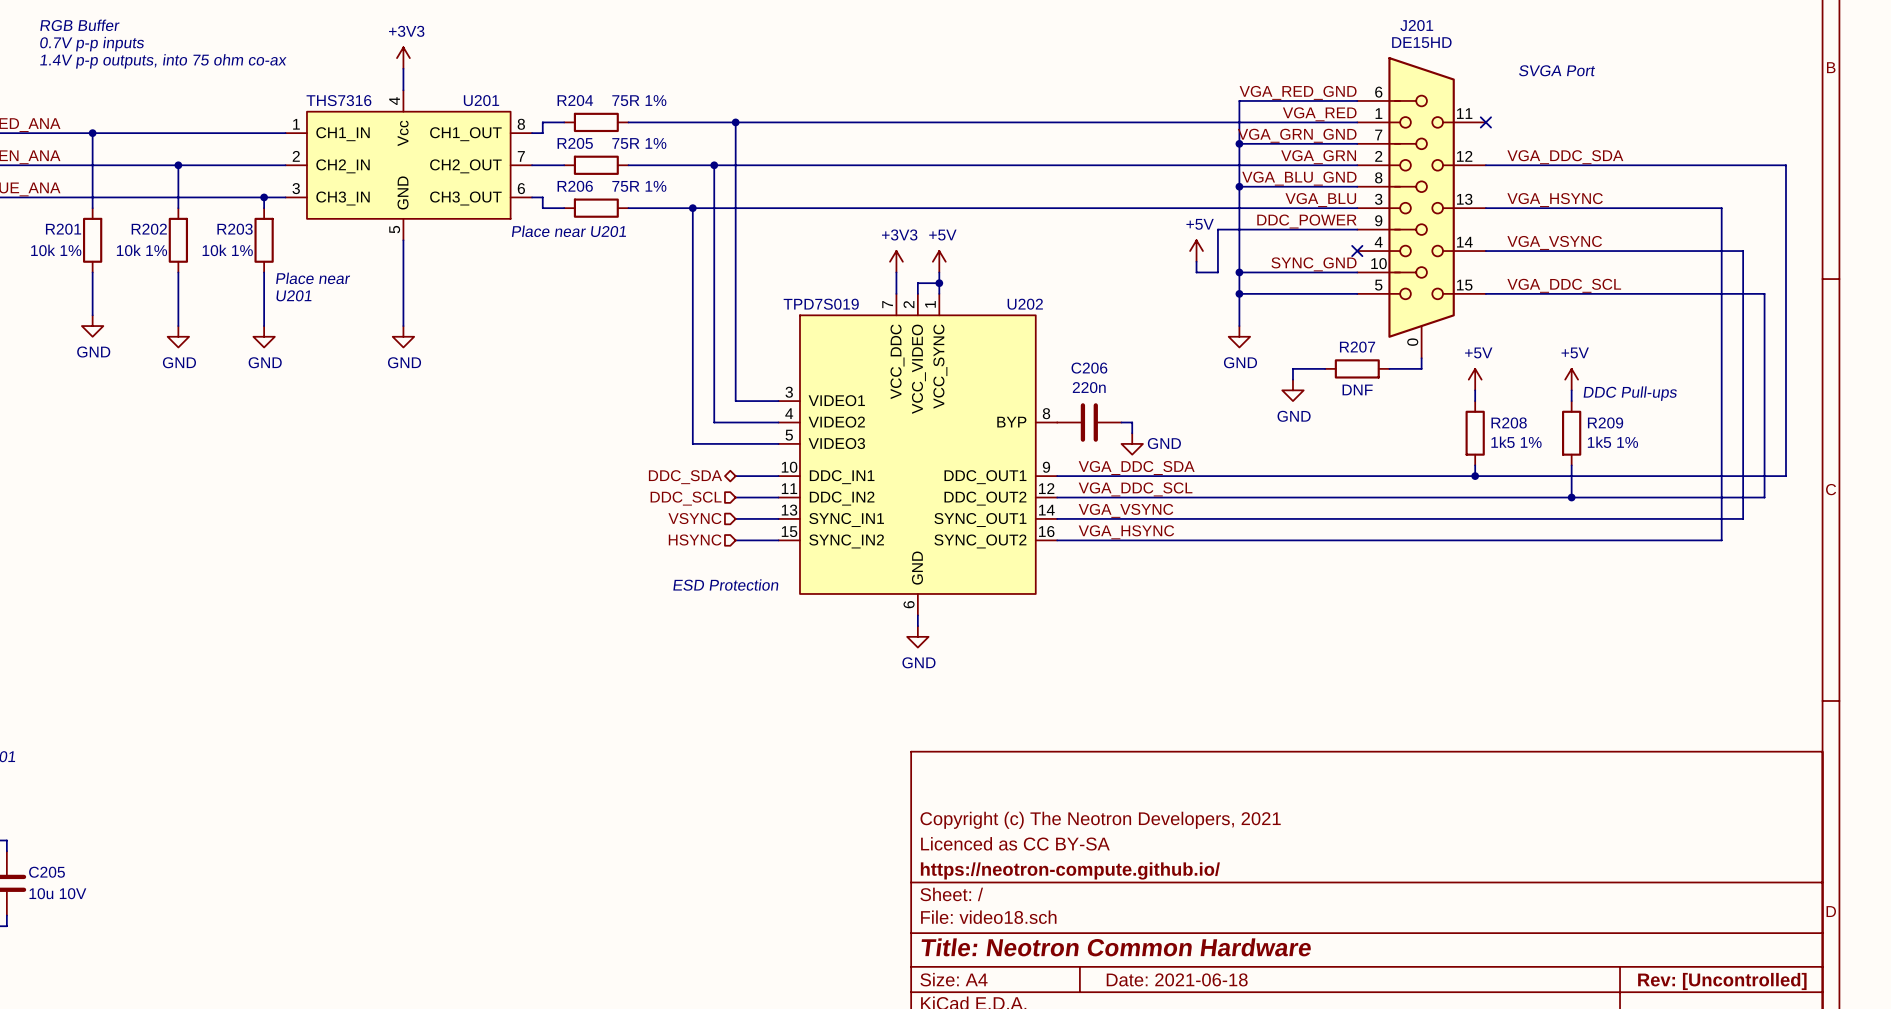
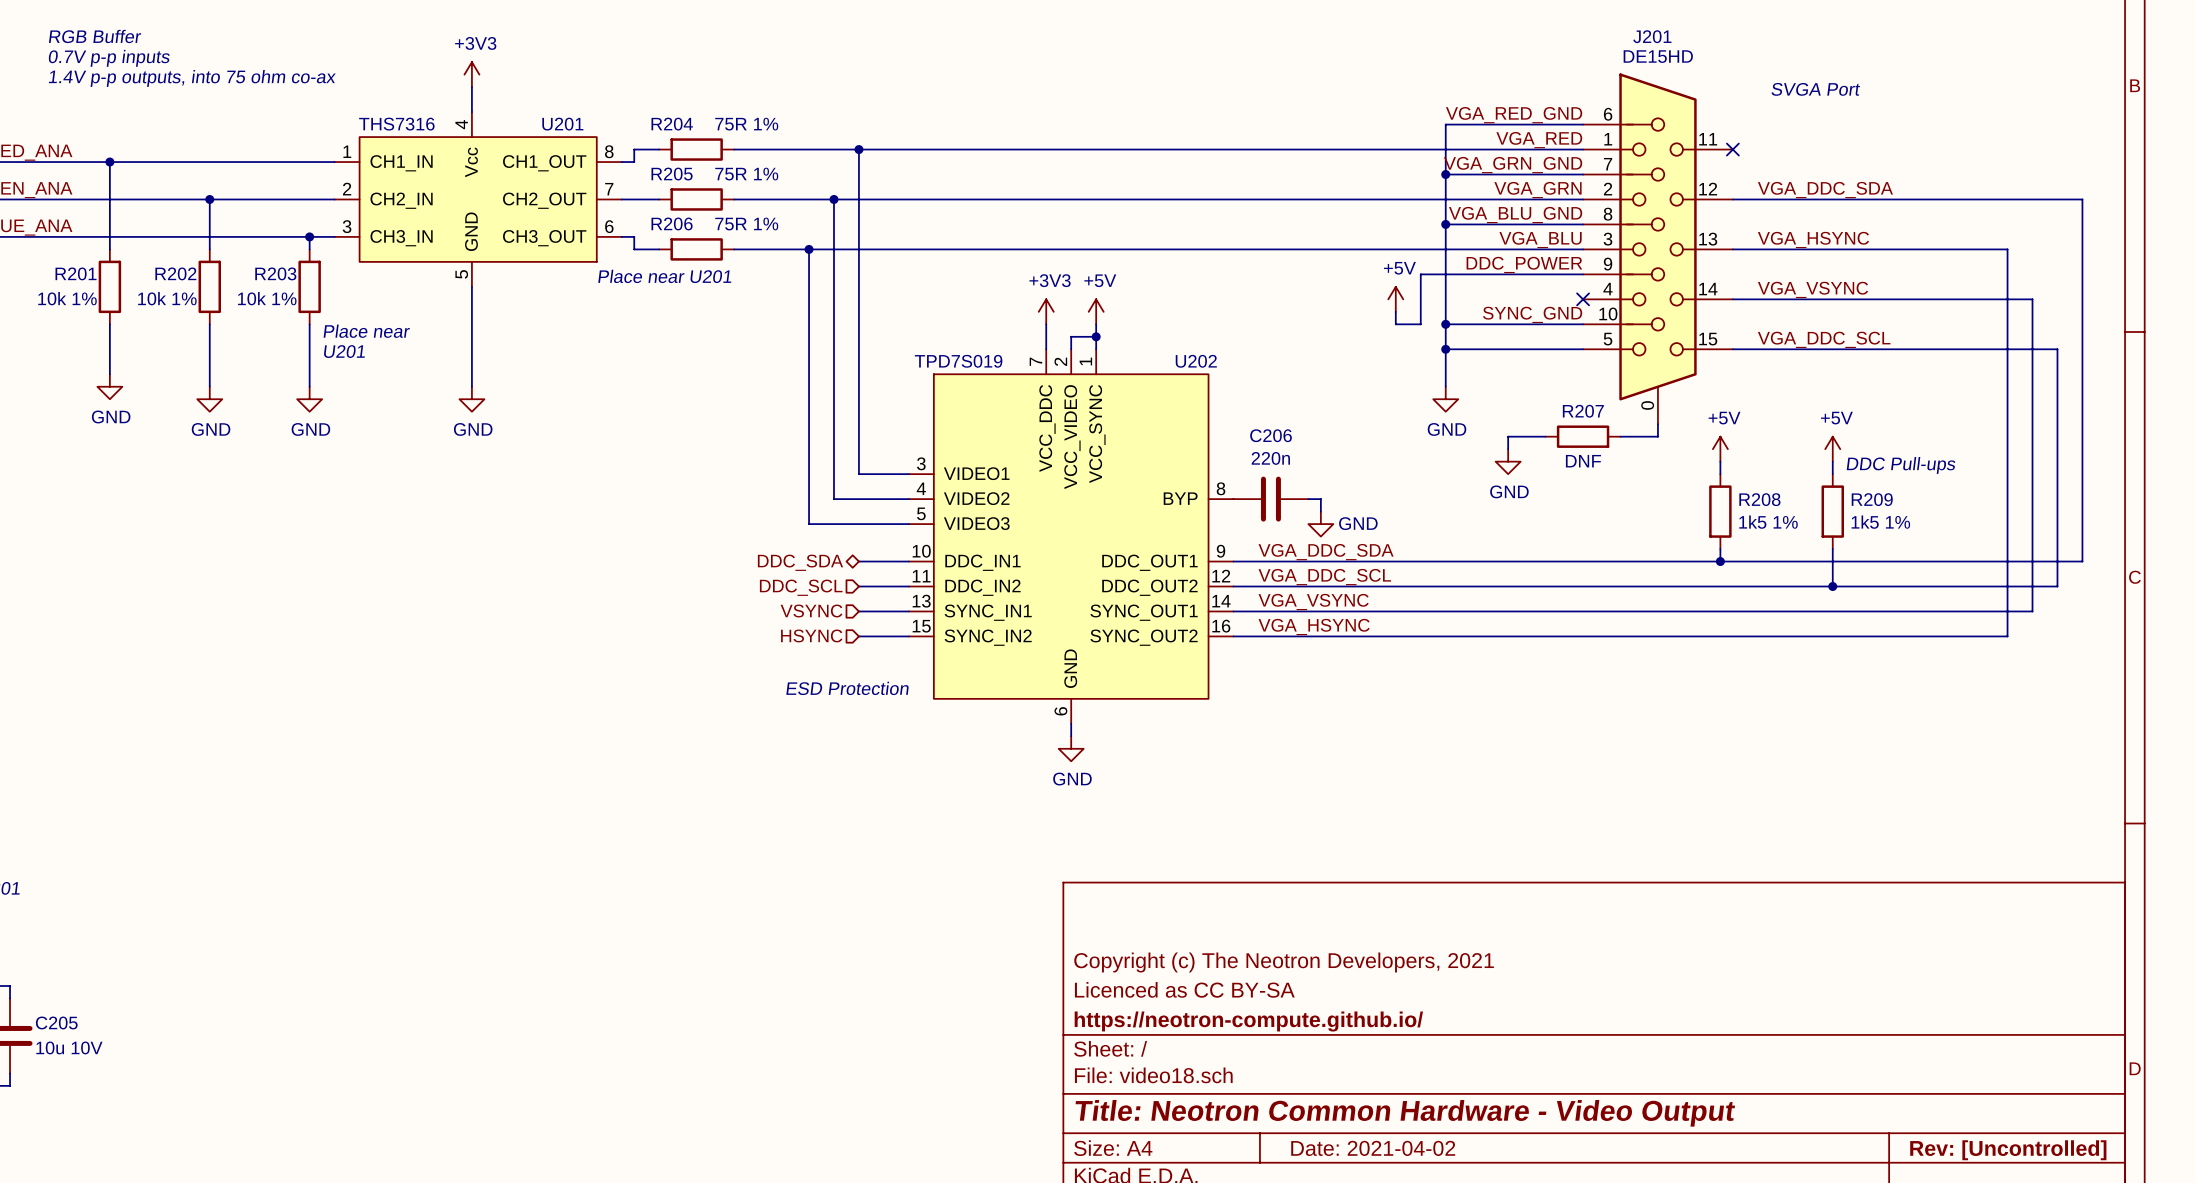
title block: Title: Neotron Common Hardware (1116, 947) -> Title: Neotron Common Hardware - Video Output (1405, 1113)
title block: Date: 2021-06-18 (1177, 979) -> Date: 2021-04-02 (1373, 1148)

